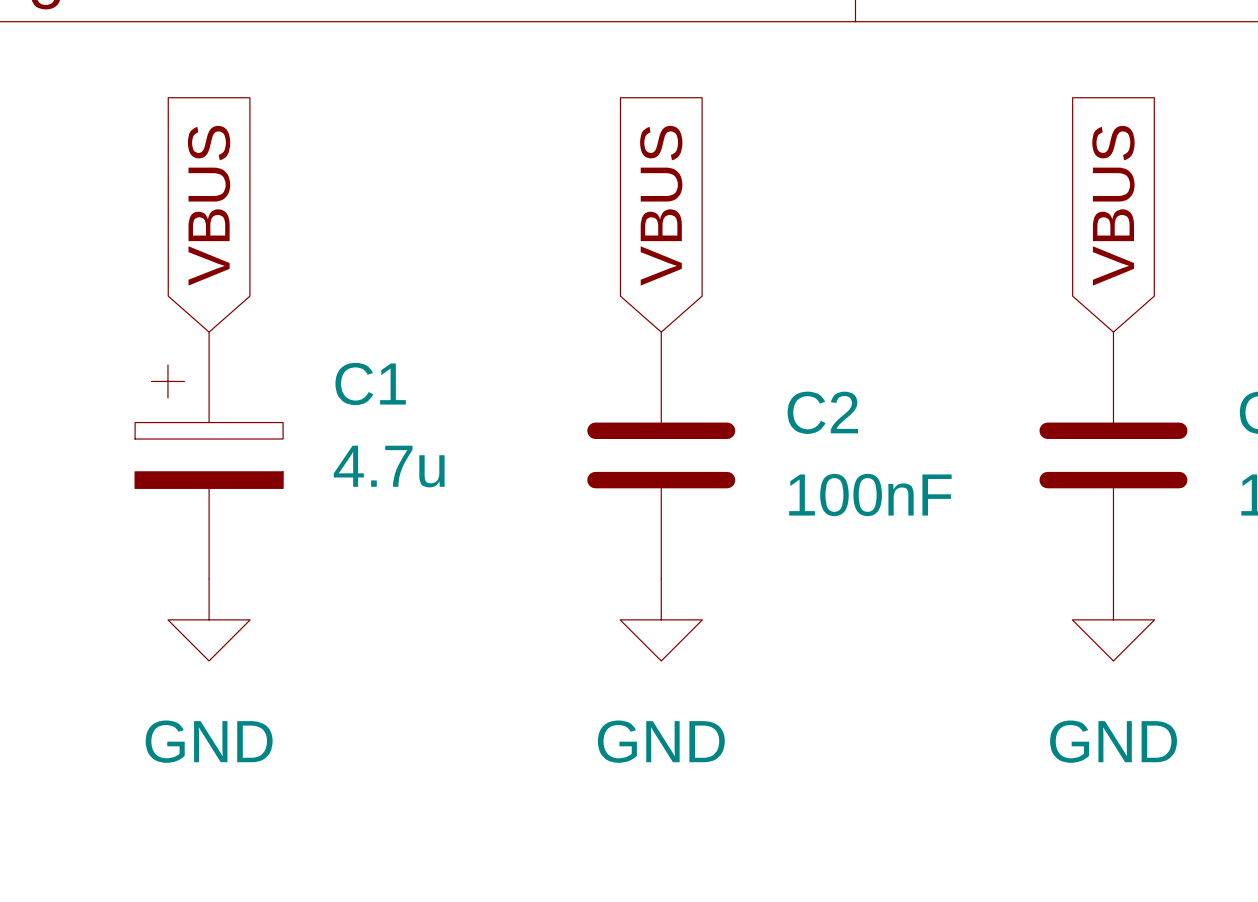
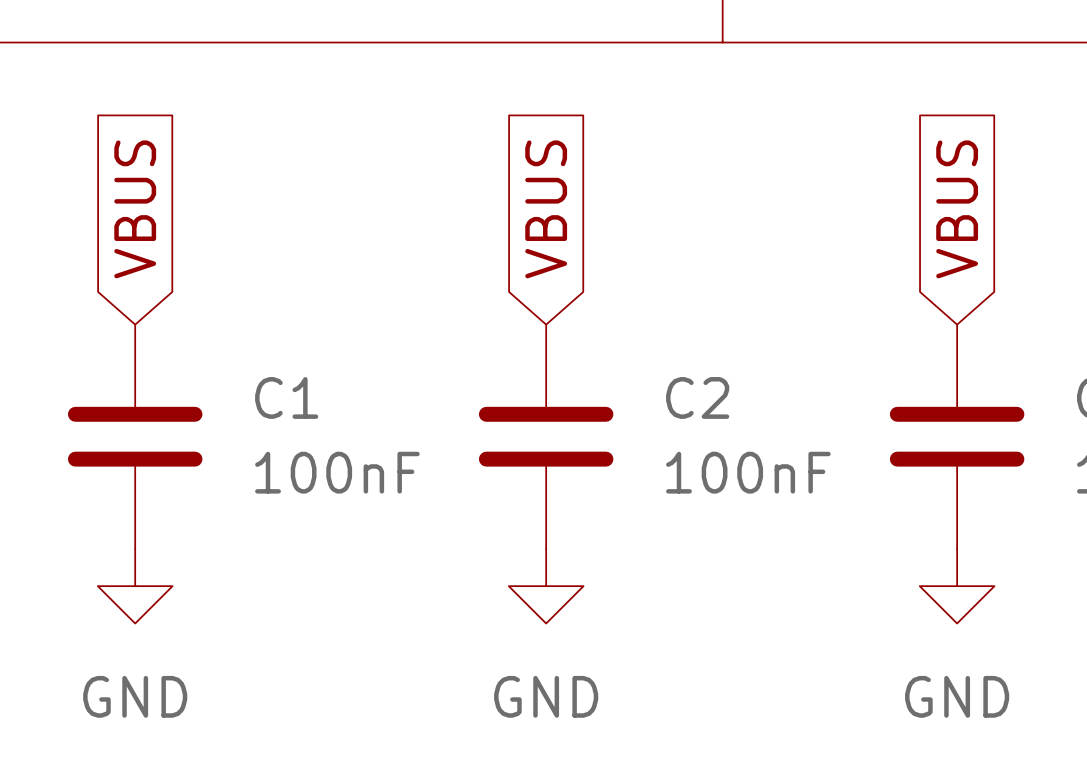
C1 symbol: [135, 332, 284, 579] -> [67, 324, 203, 549]
C1 value: 4.7u (389, 466) -> 100nF (337, 472)

